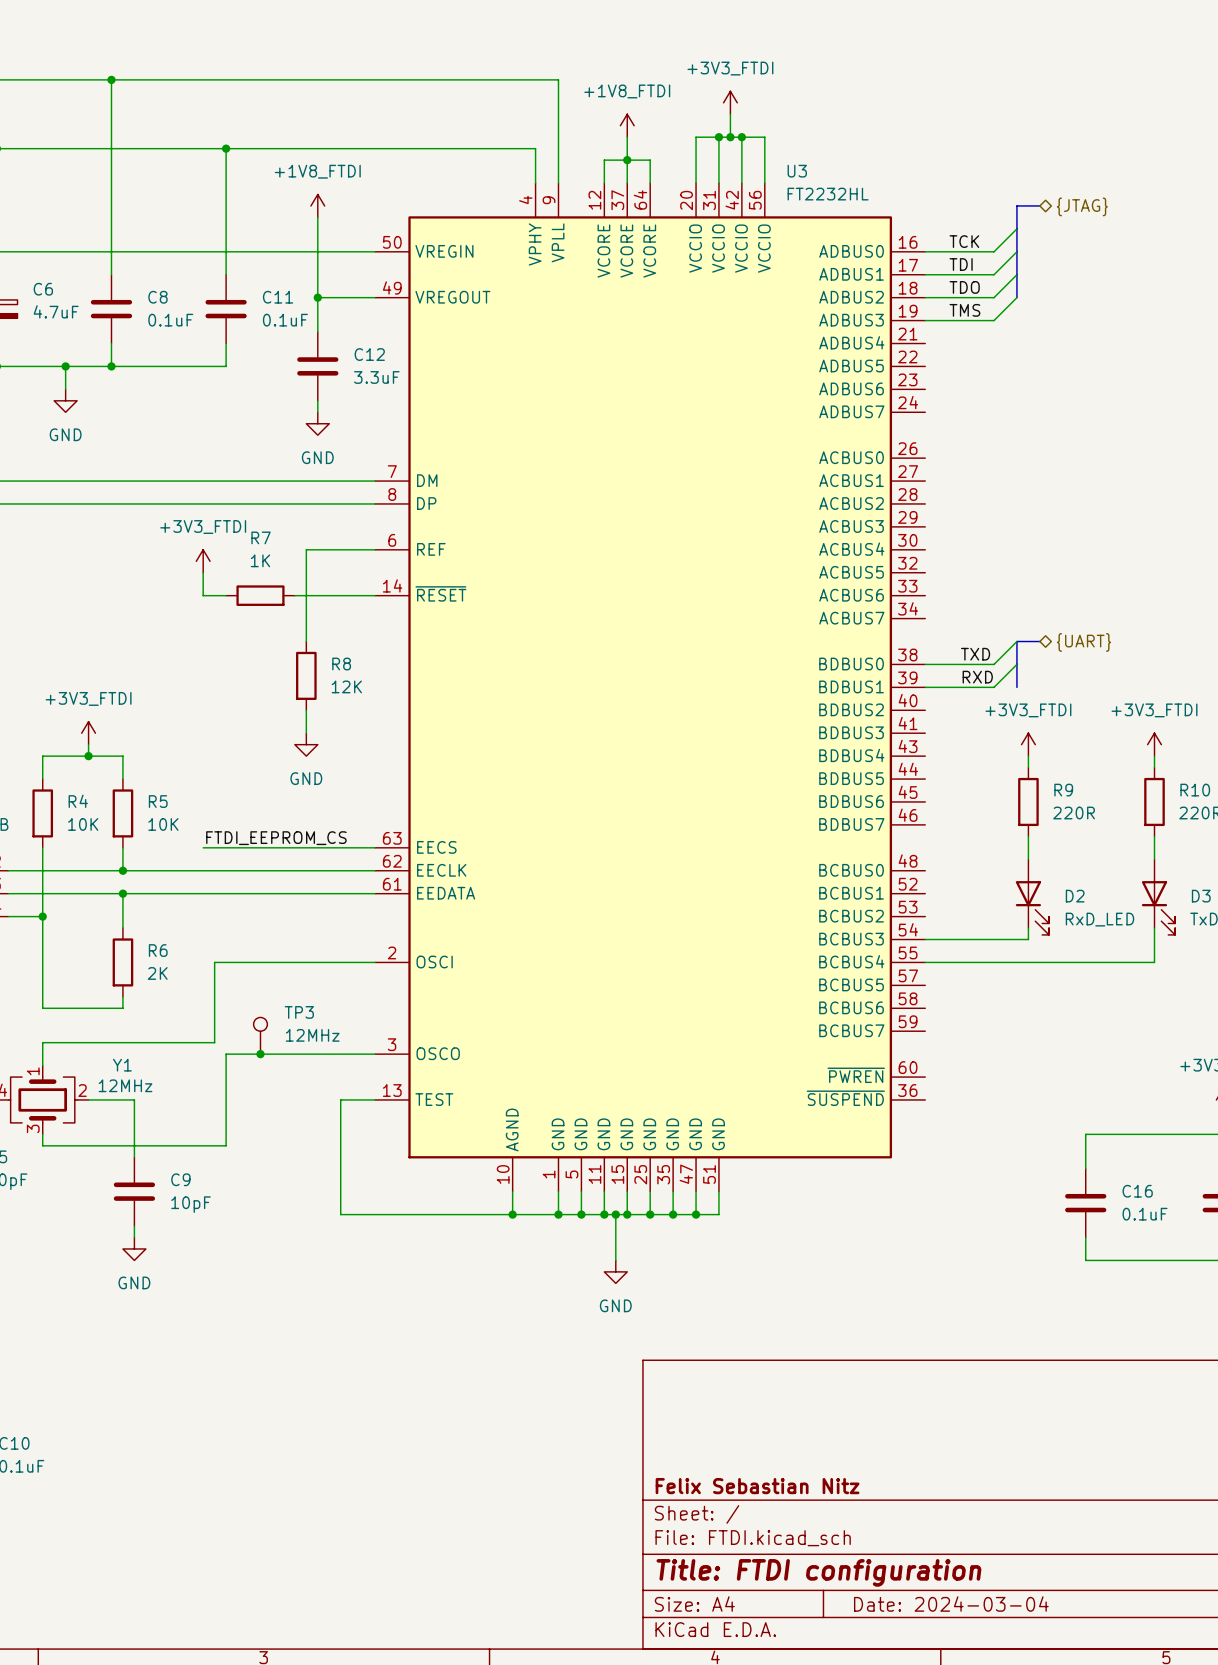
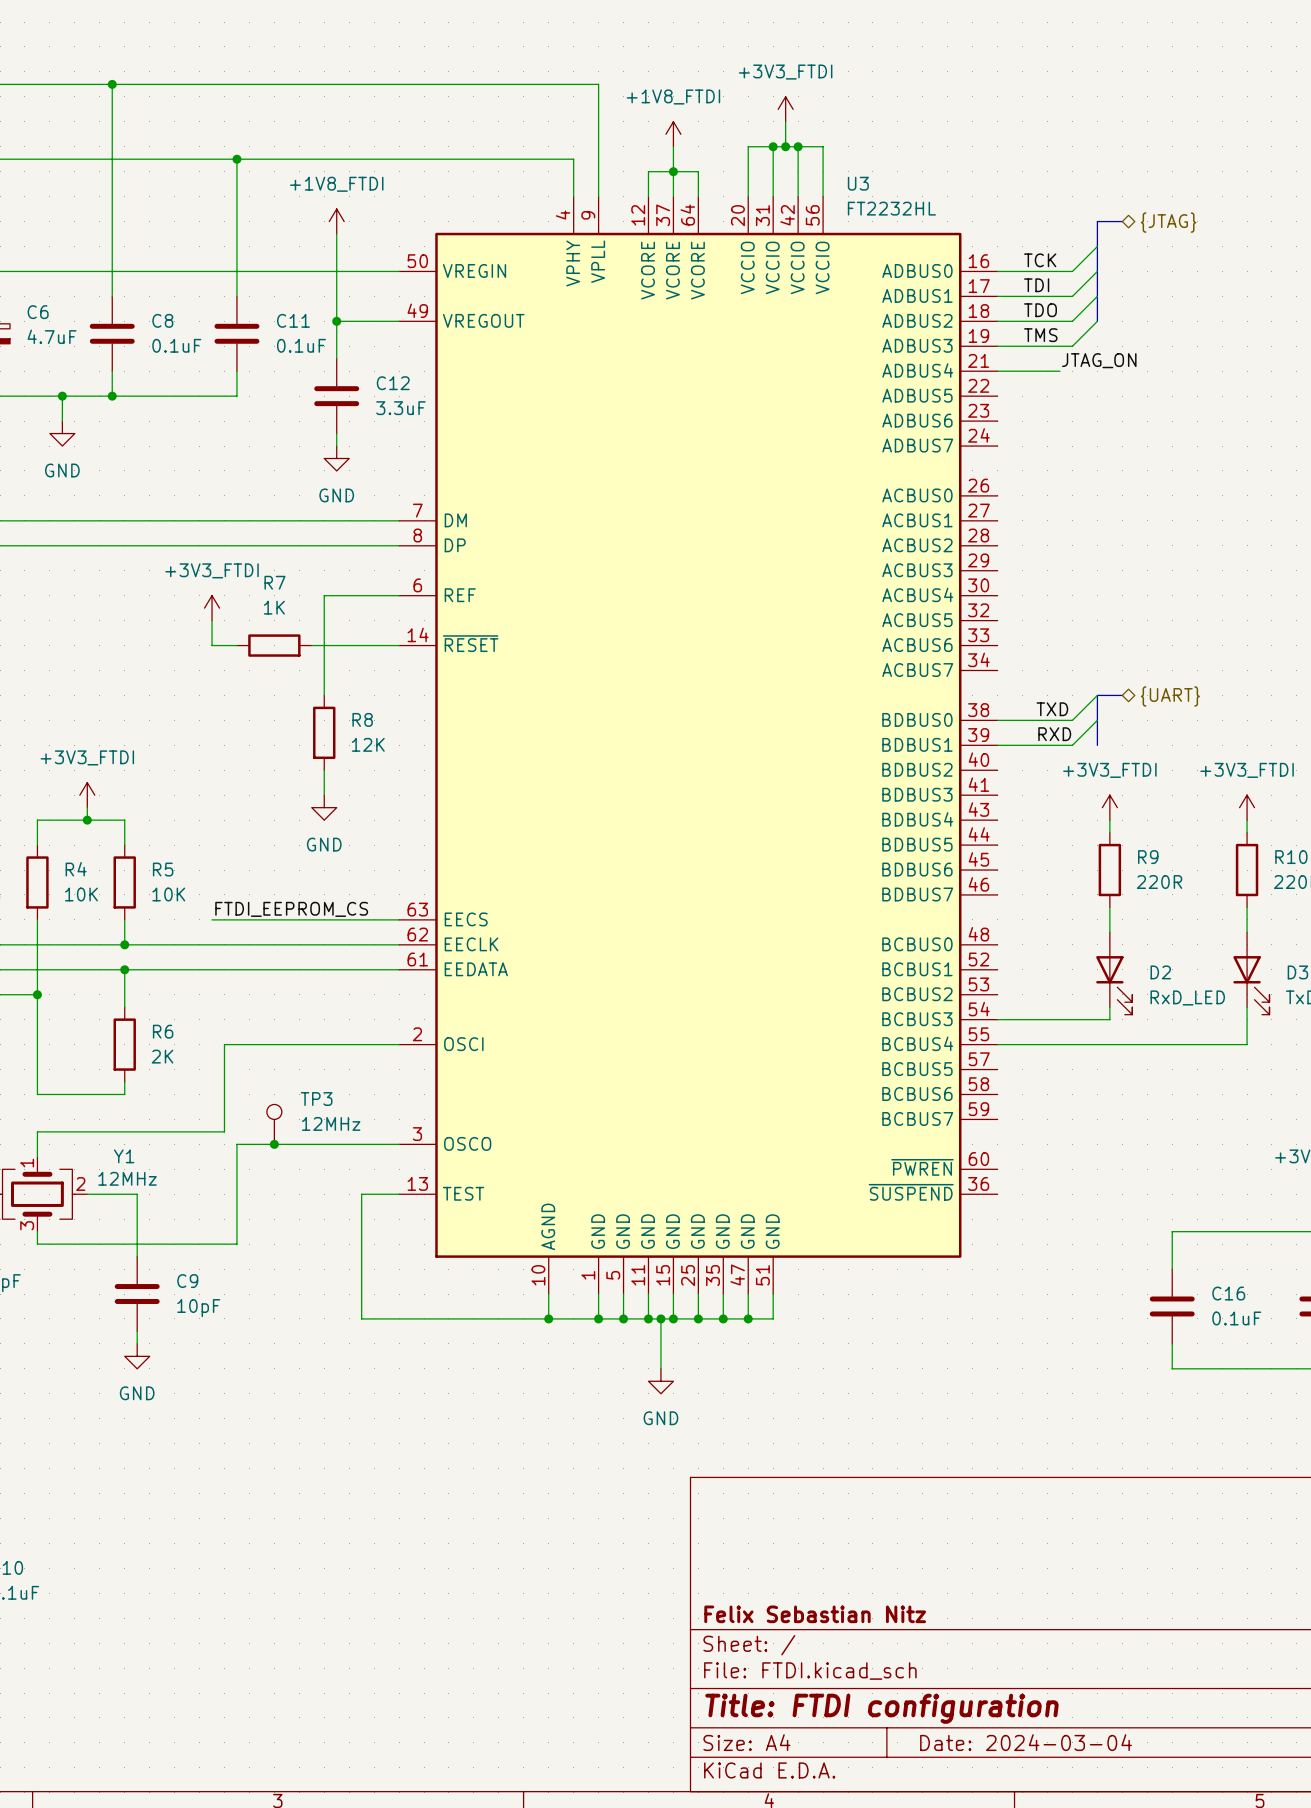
label: none -> JTAG_ON (1099, 360)
wire: none -> (997, 371) (1059, 371)

